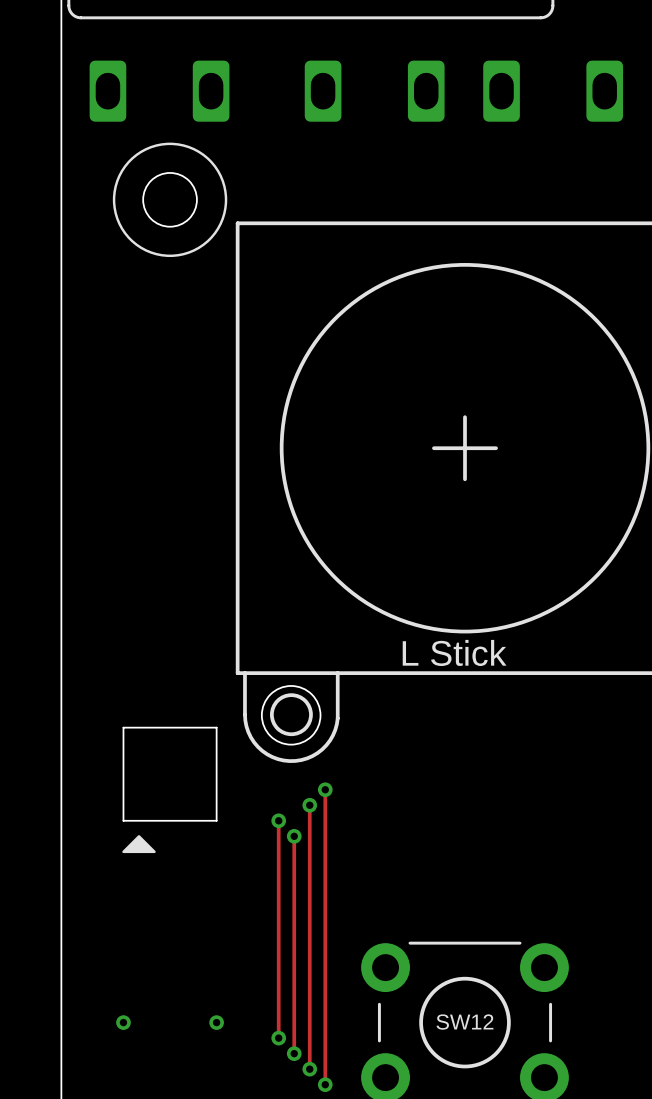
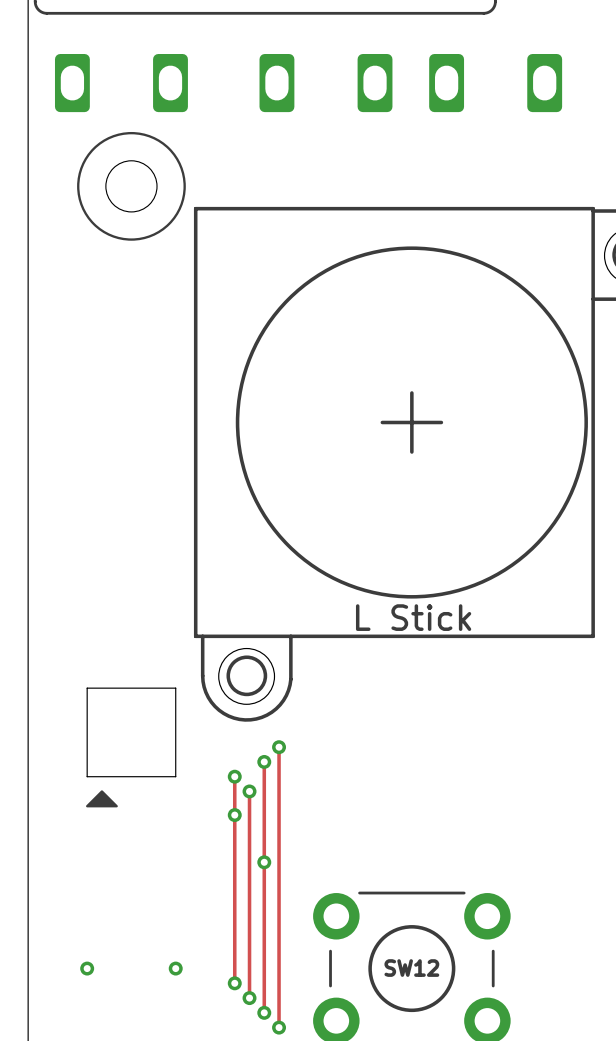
via: none -> (234, 815)
via: none -> (264, 862)

